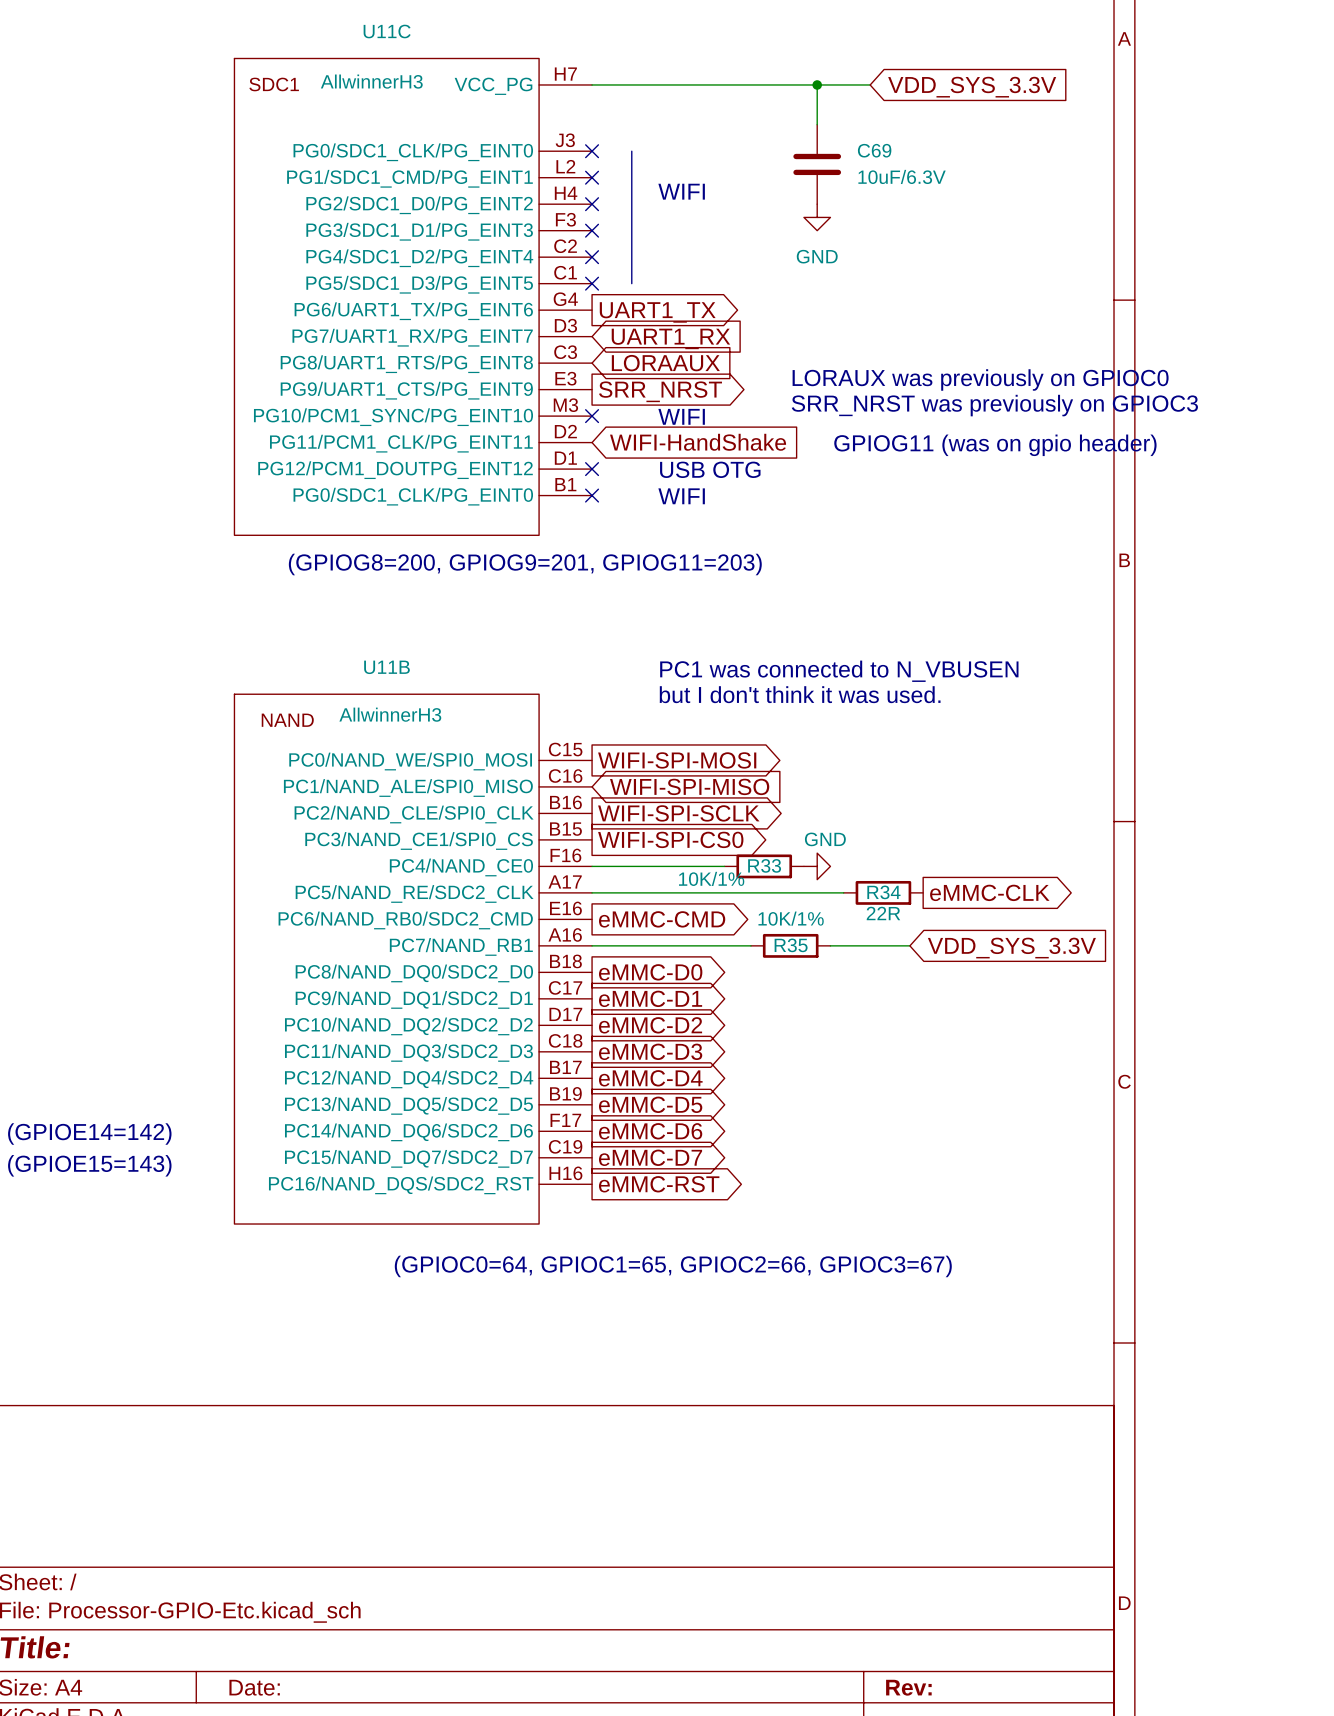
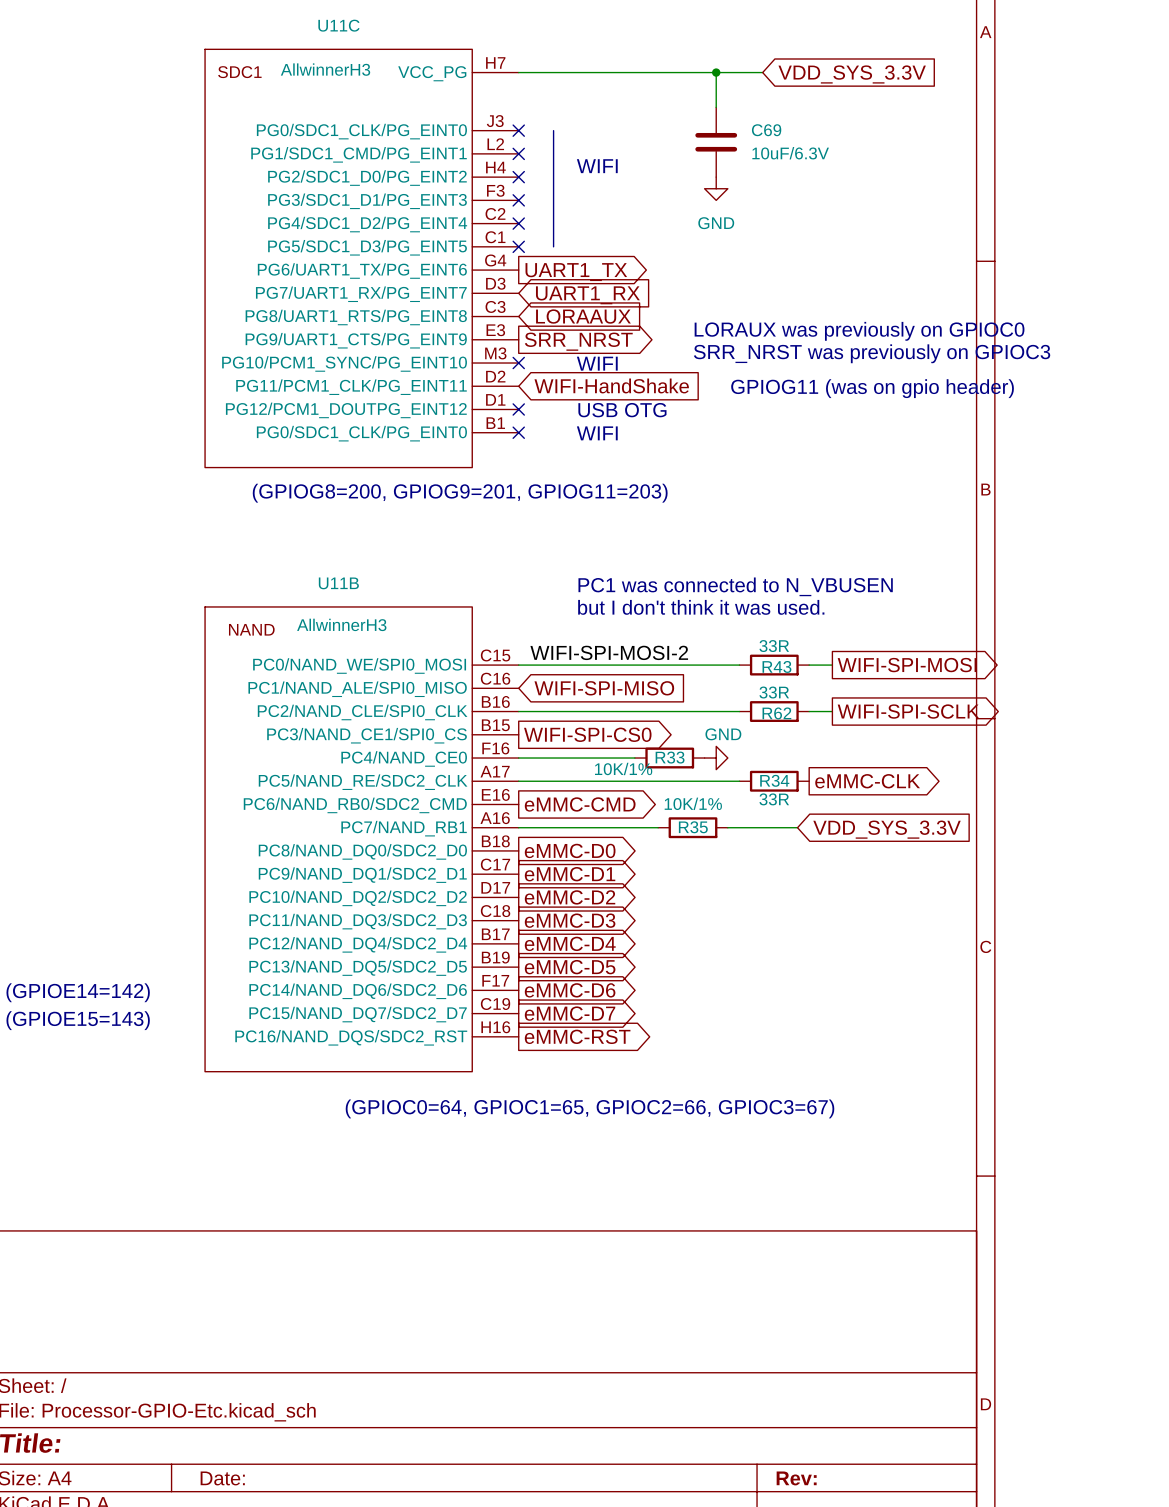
label: none -> WIFI-SPI-MOSI-2 (609, 652)
wire: none -> (518, 665) (739, 665)
global label: WIFI-SPI-MOSI (677, 760) -> none
R43: none -> 33R (774, 665)
wire: none -> (809, 665) (832, 665)
global label: none -> WIFI-SPI-MOSI (907, 665)
wire: none -> (518, 711) (739, 711)
global label: WIFI-SPI-SCLK (678, 813) -> none
R62: none -> 33R (774, 711)
wire: none -> (809, 711) (832, 711)
global label: none -> WIFI-SPI-SCLK (908, 711)
R34 value: 22R (883, 913) -> 33R (774, 799)

